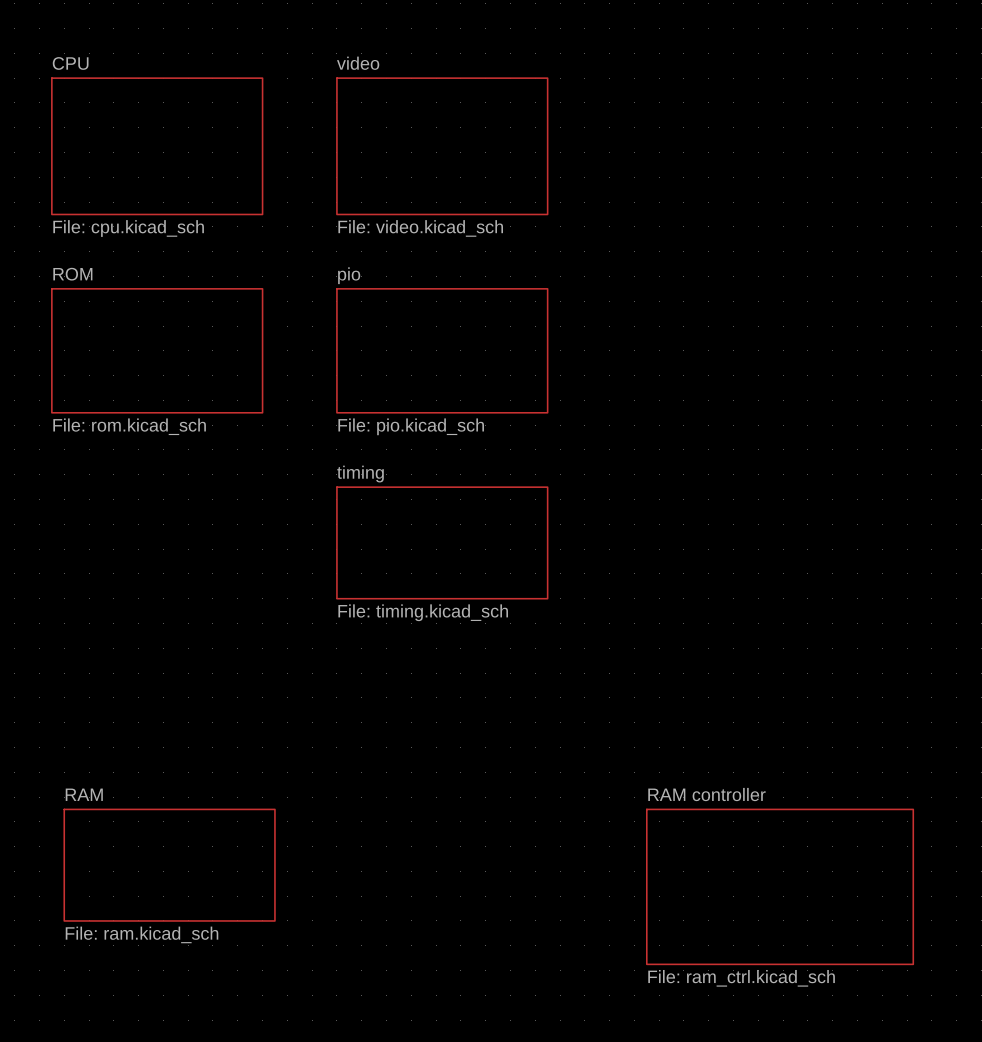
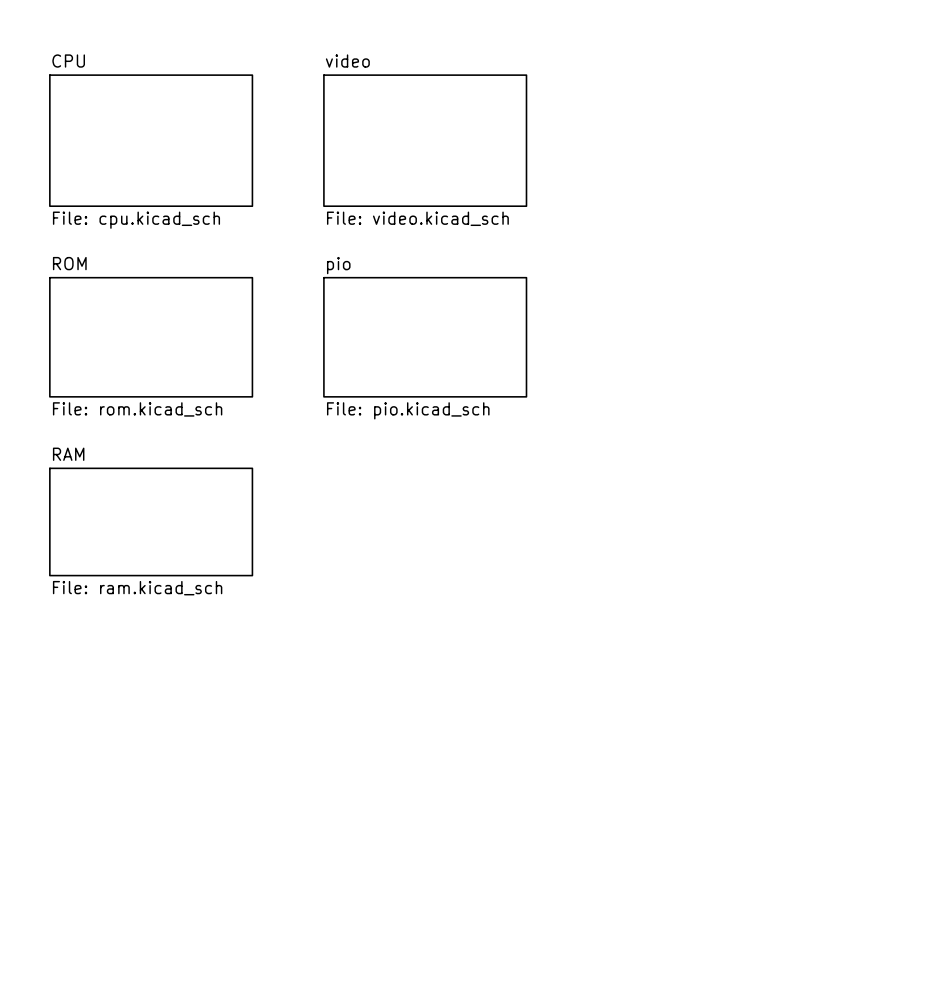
sheet RAM: none -> File: ram.kicad_sch (151, 521)
sheet timing: File: timing.kicad_sch (442, 542) -> none
sheet RAM: File: ram.kicad_sch (169, 865) -> none
sheet RAM controller: File: ram_ctrl.kicad_sch (780, 886) -> none

